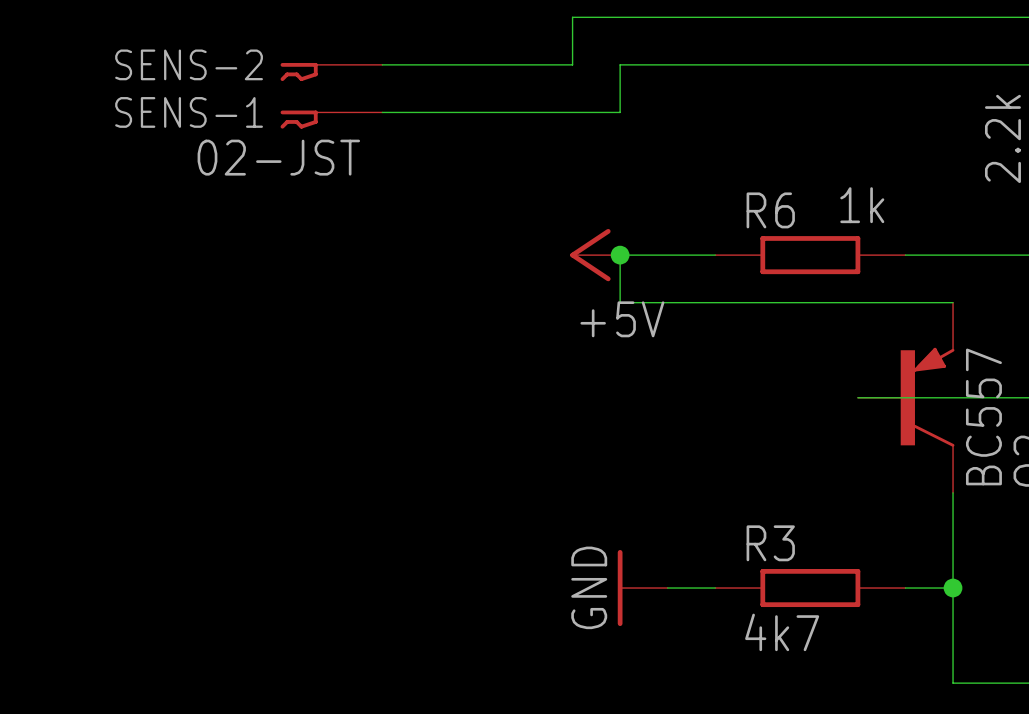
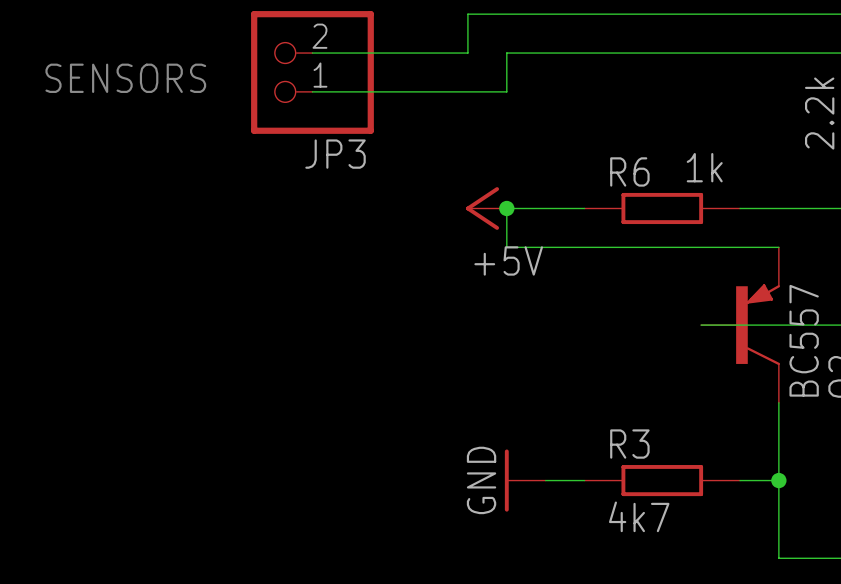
SENS-2: (331, 72) -> none
JP3: none -> (312, 72)
text: none -> SENSORS (125, 78)
SENS-1: 02-JST (331, 119) -> none

